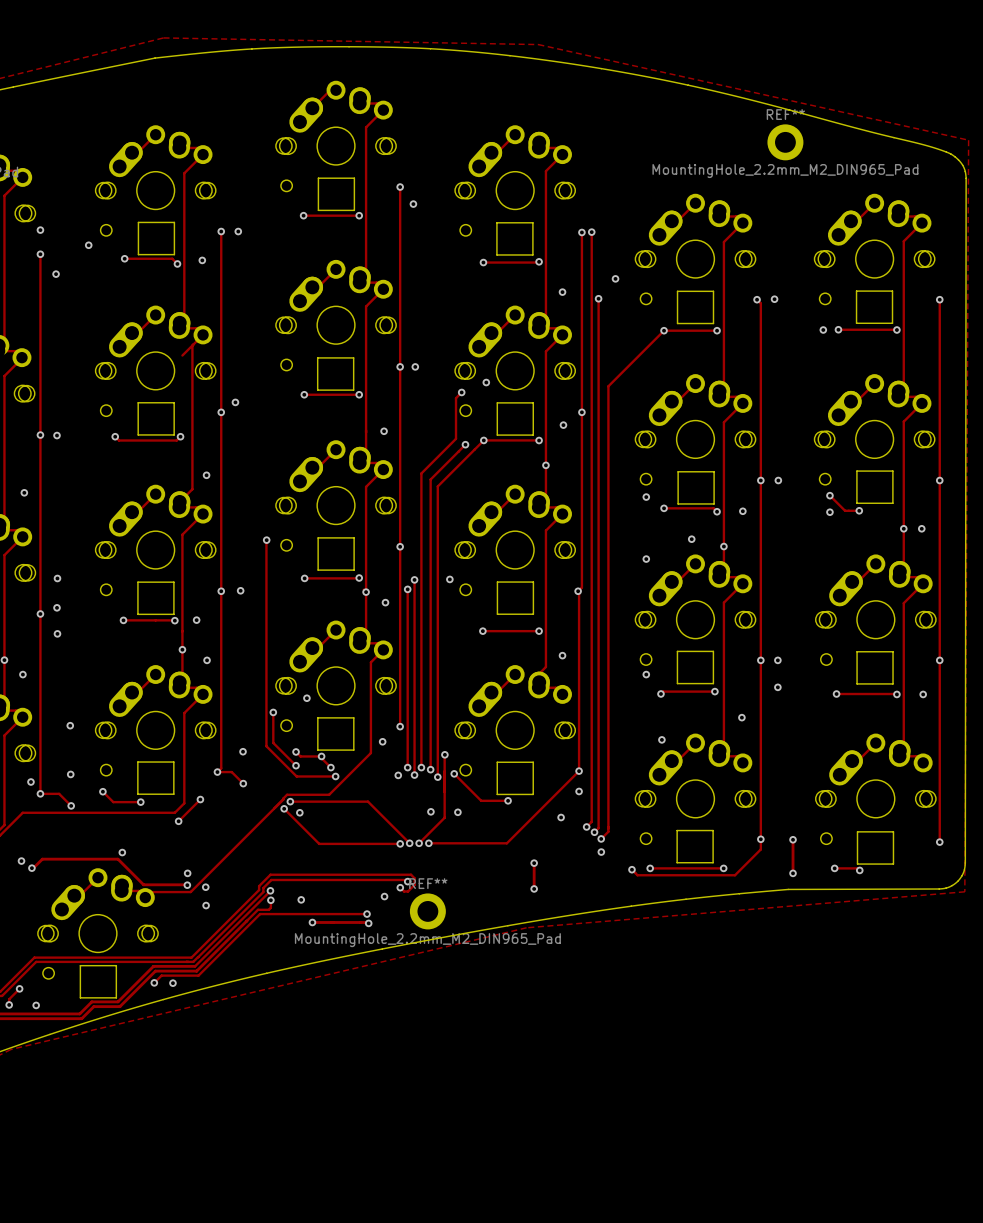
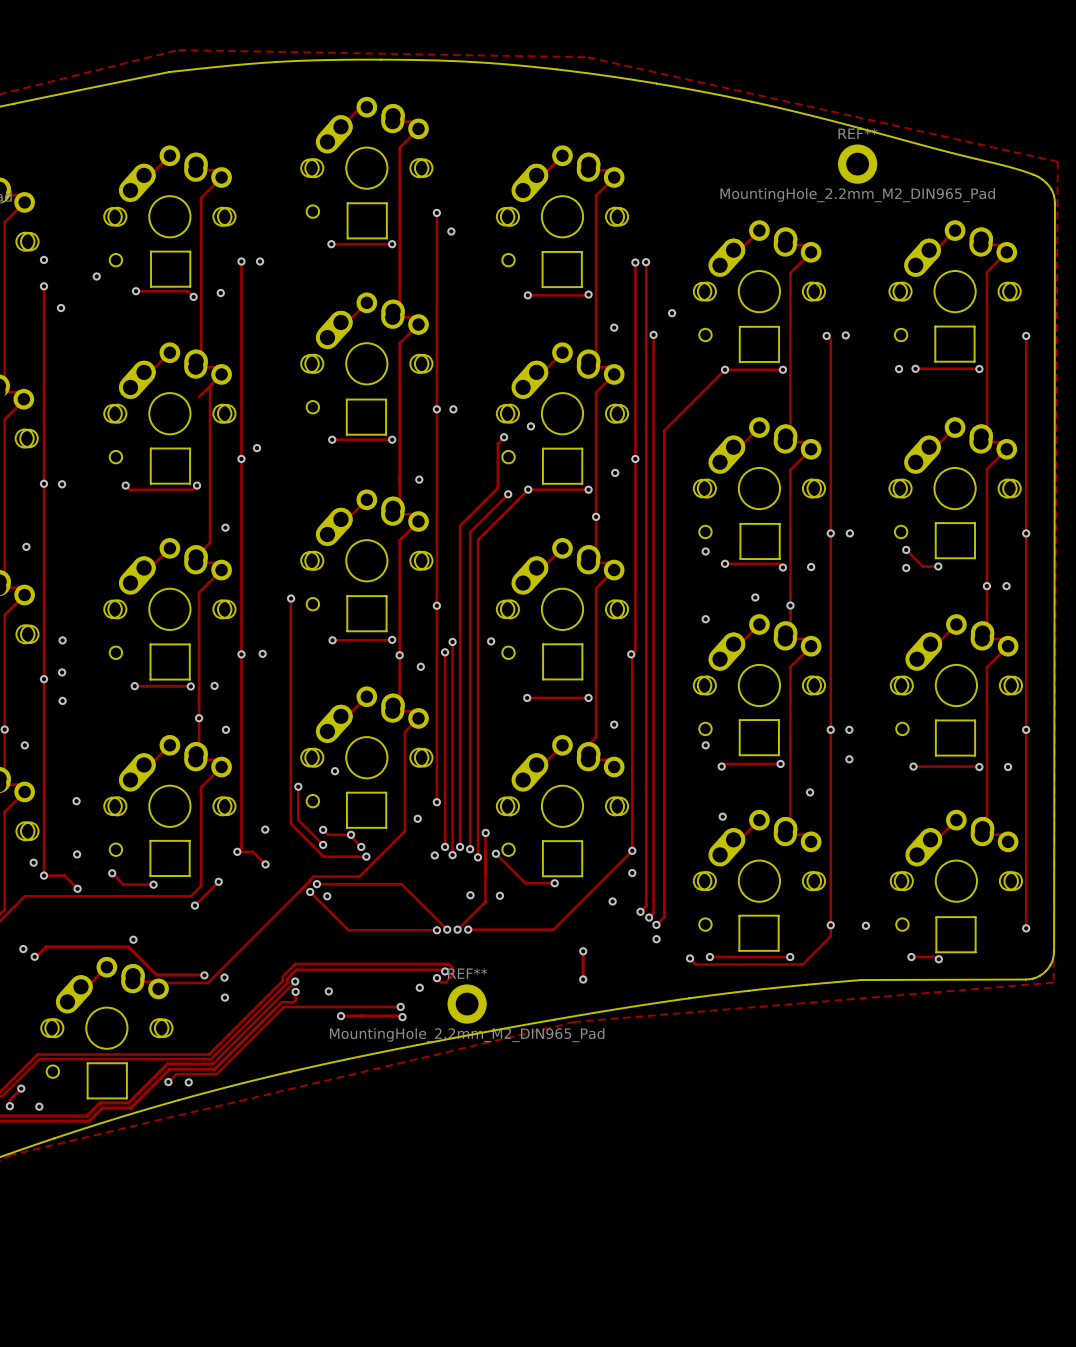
track: (793, 839) (793, 873) -> none
via: (187, 873) -> none
via: (793, 873) -> none

